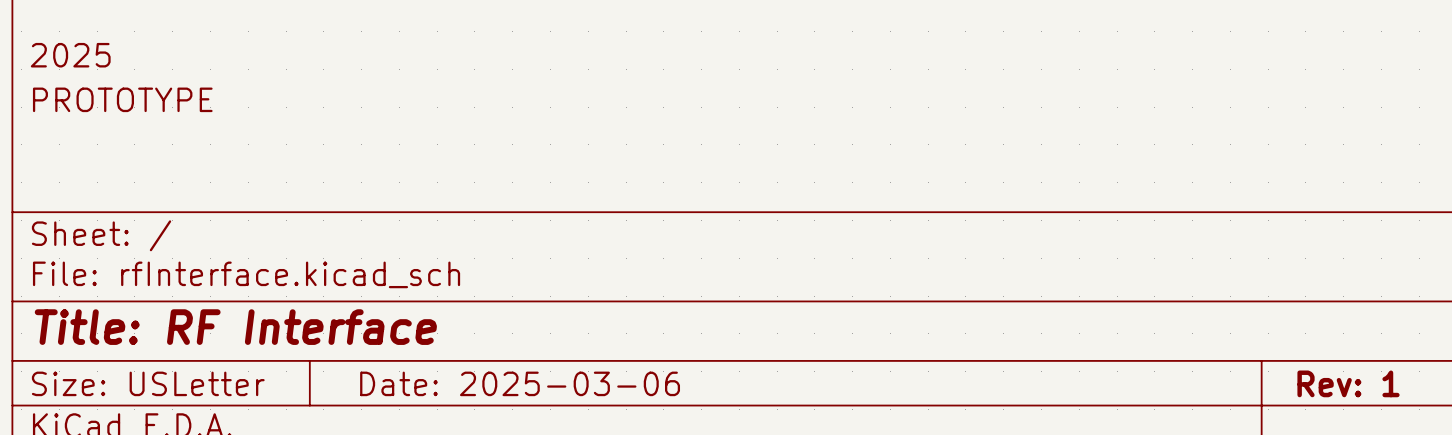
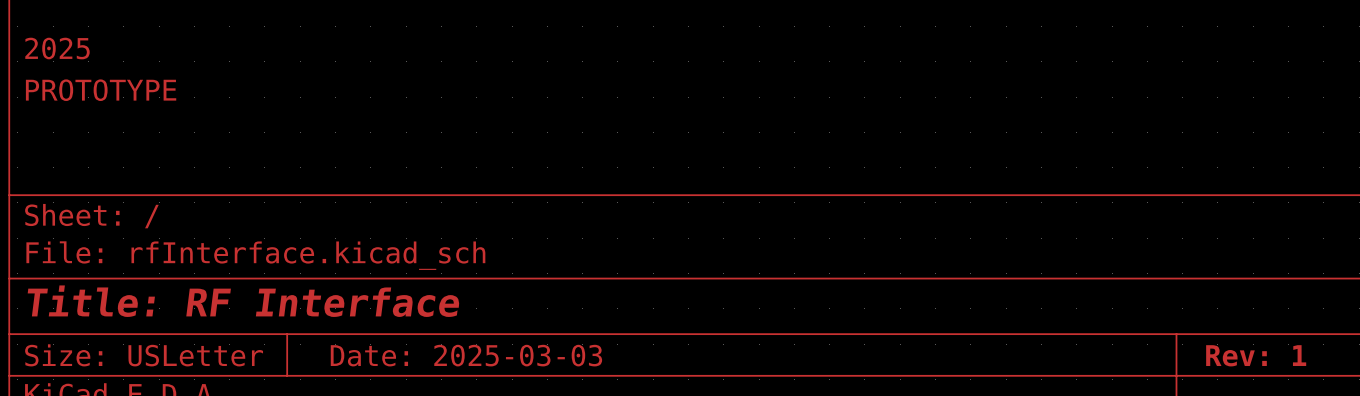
title block: Date: 2025-03-06 (520, 383) -> Date: 2025-03-03 (466, 355)

